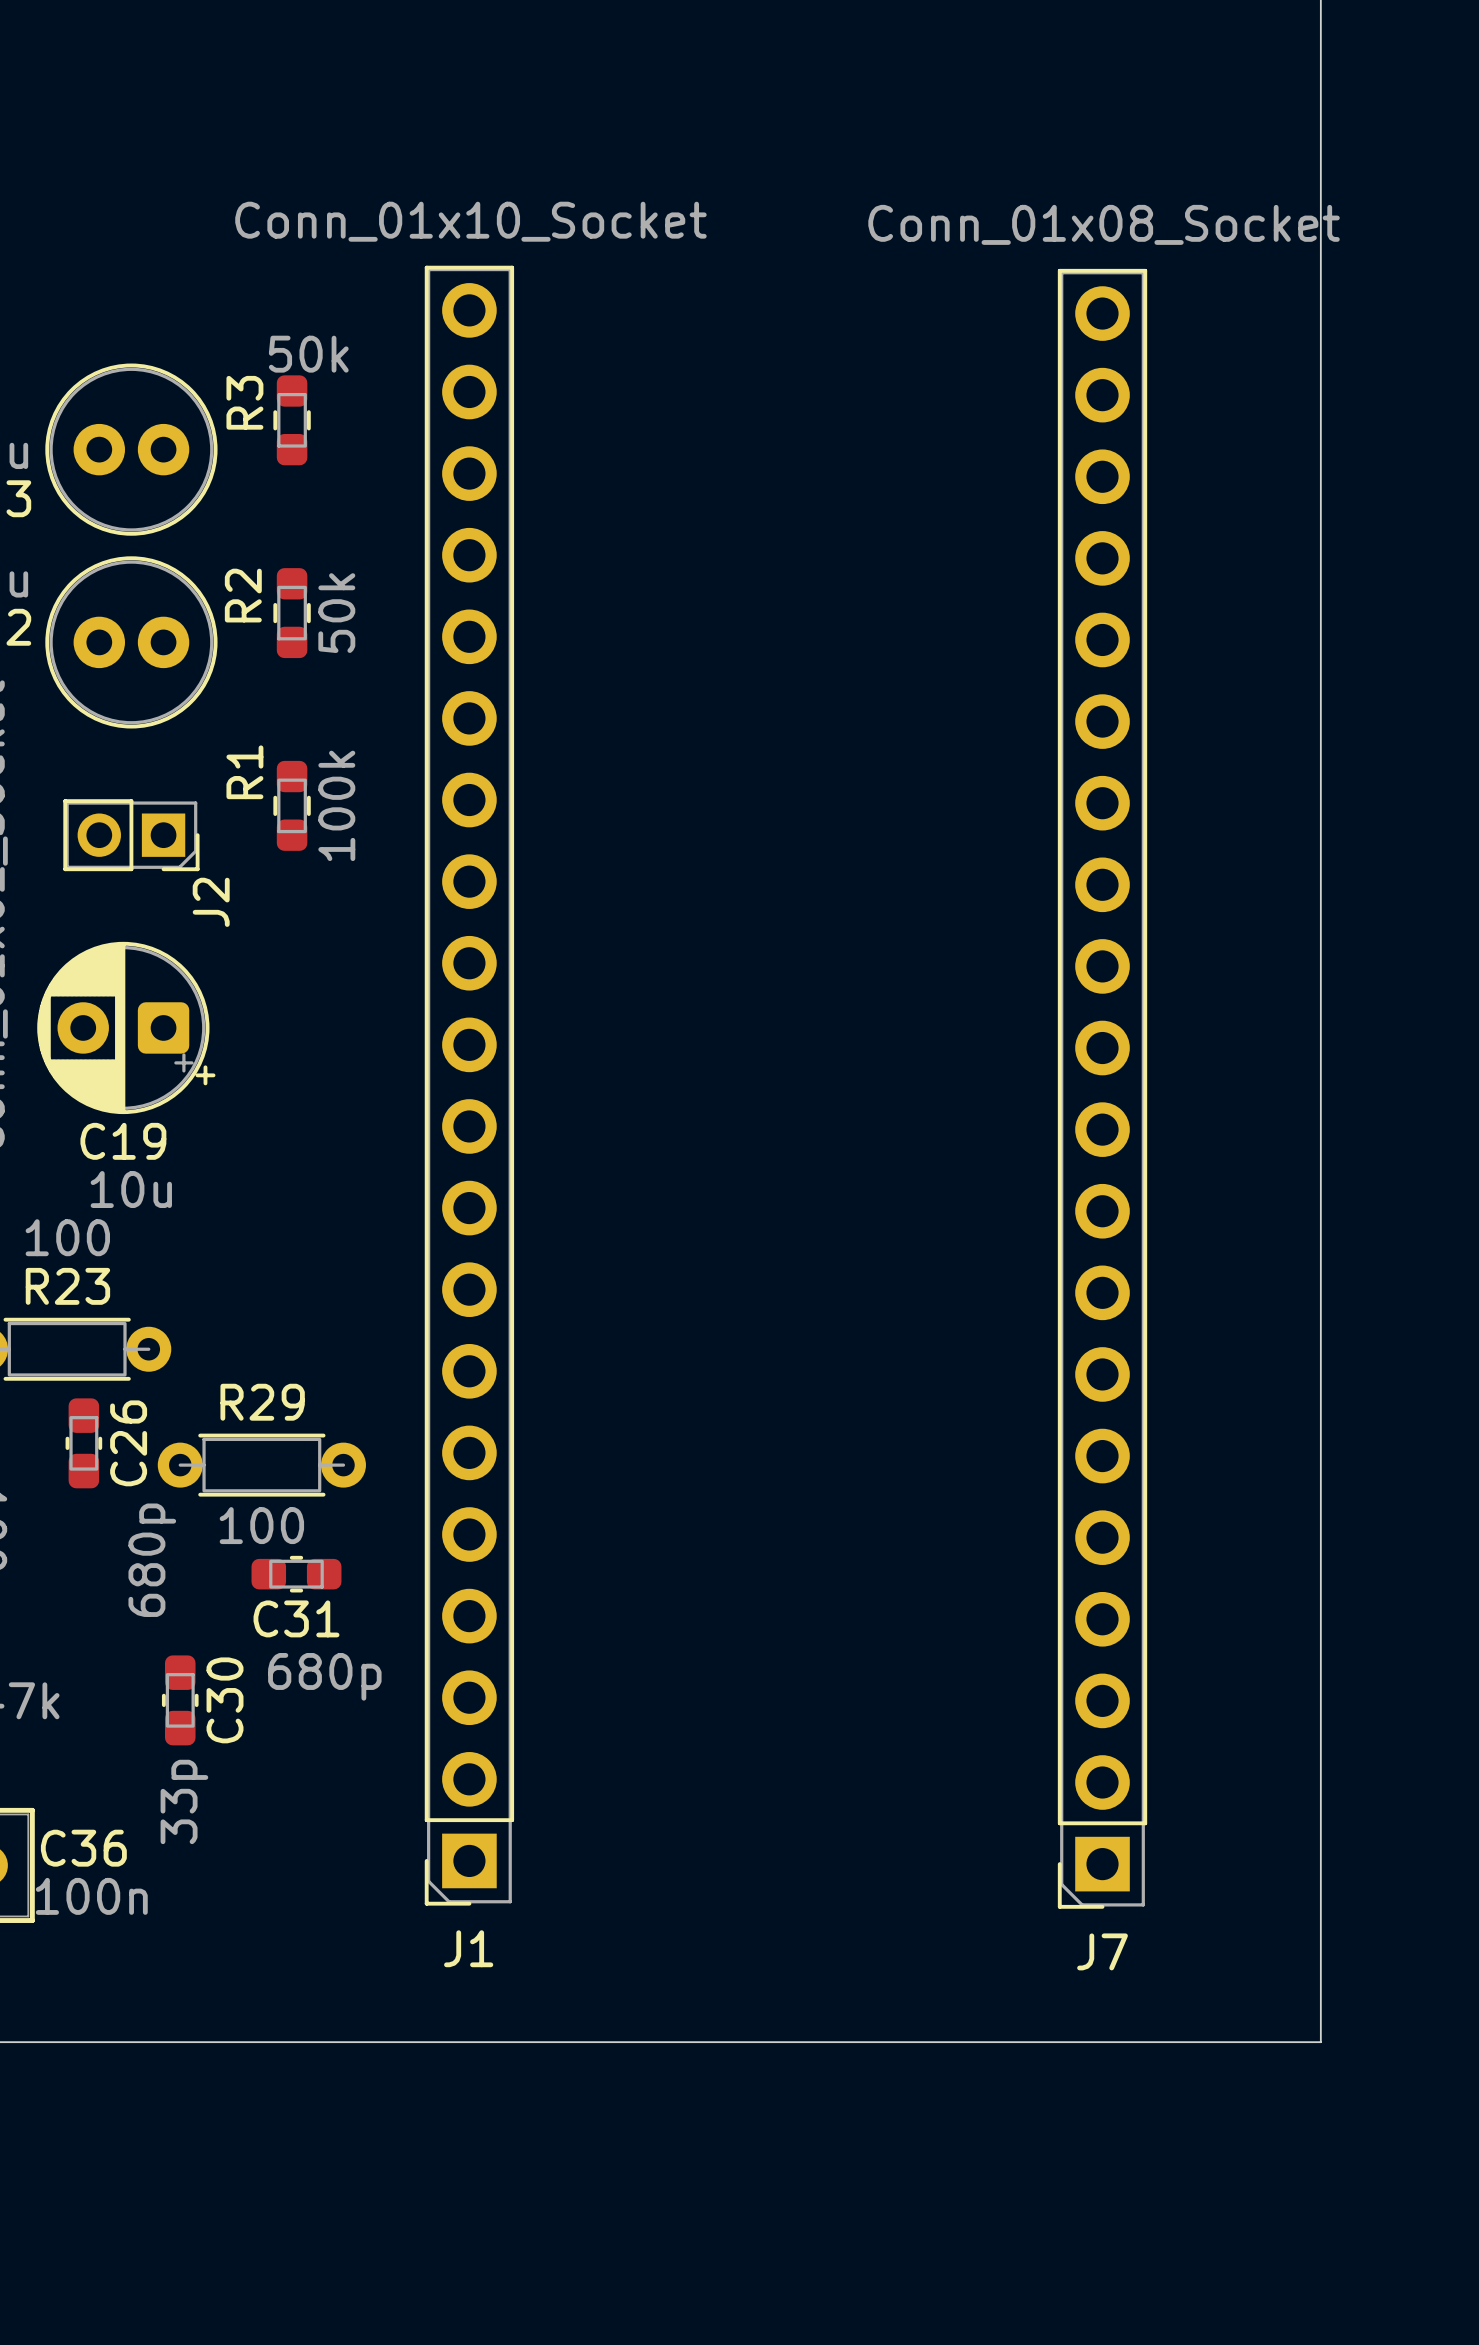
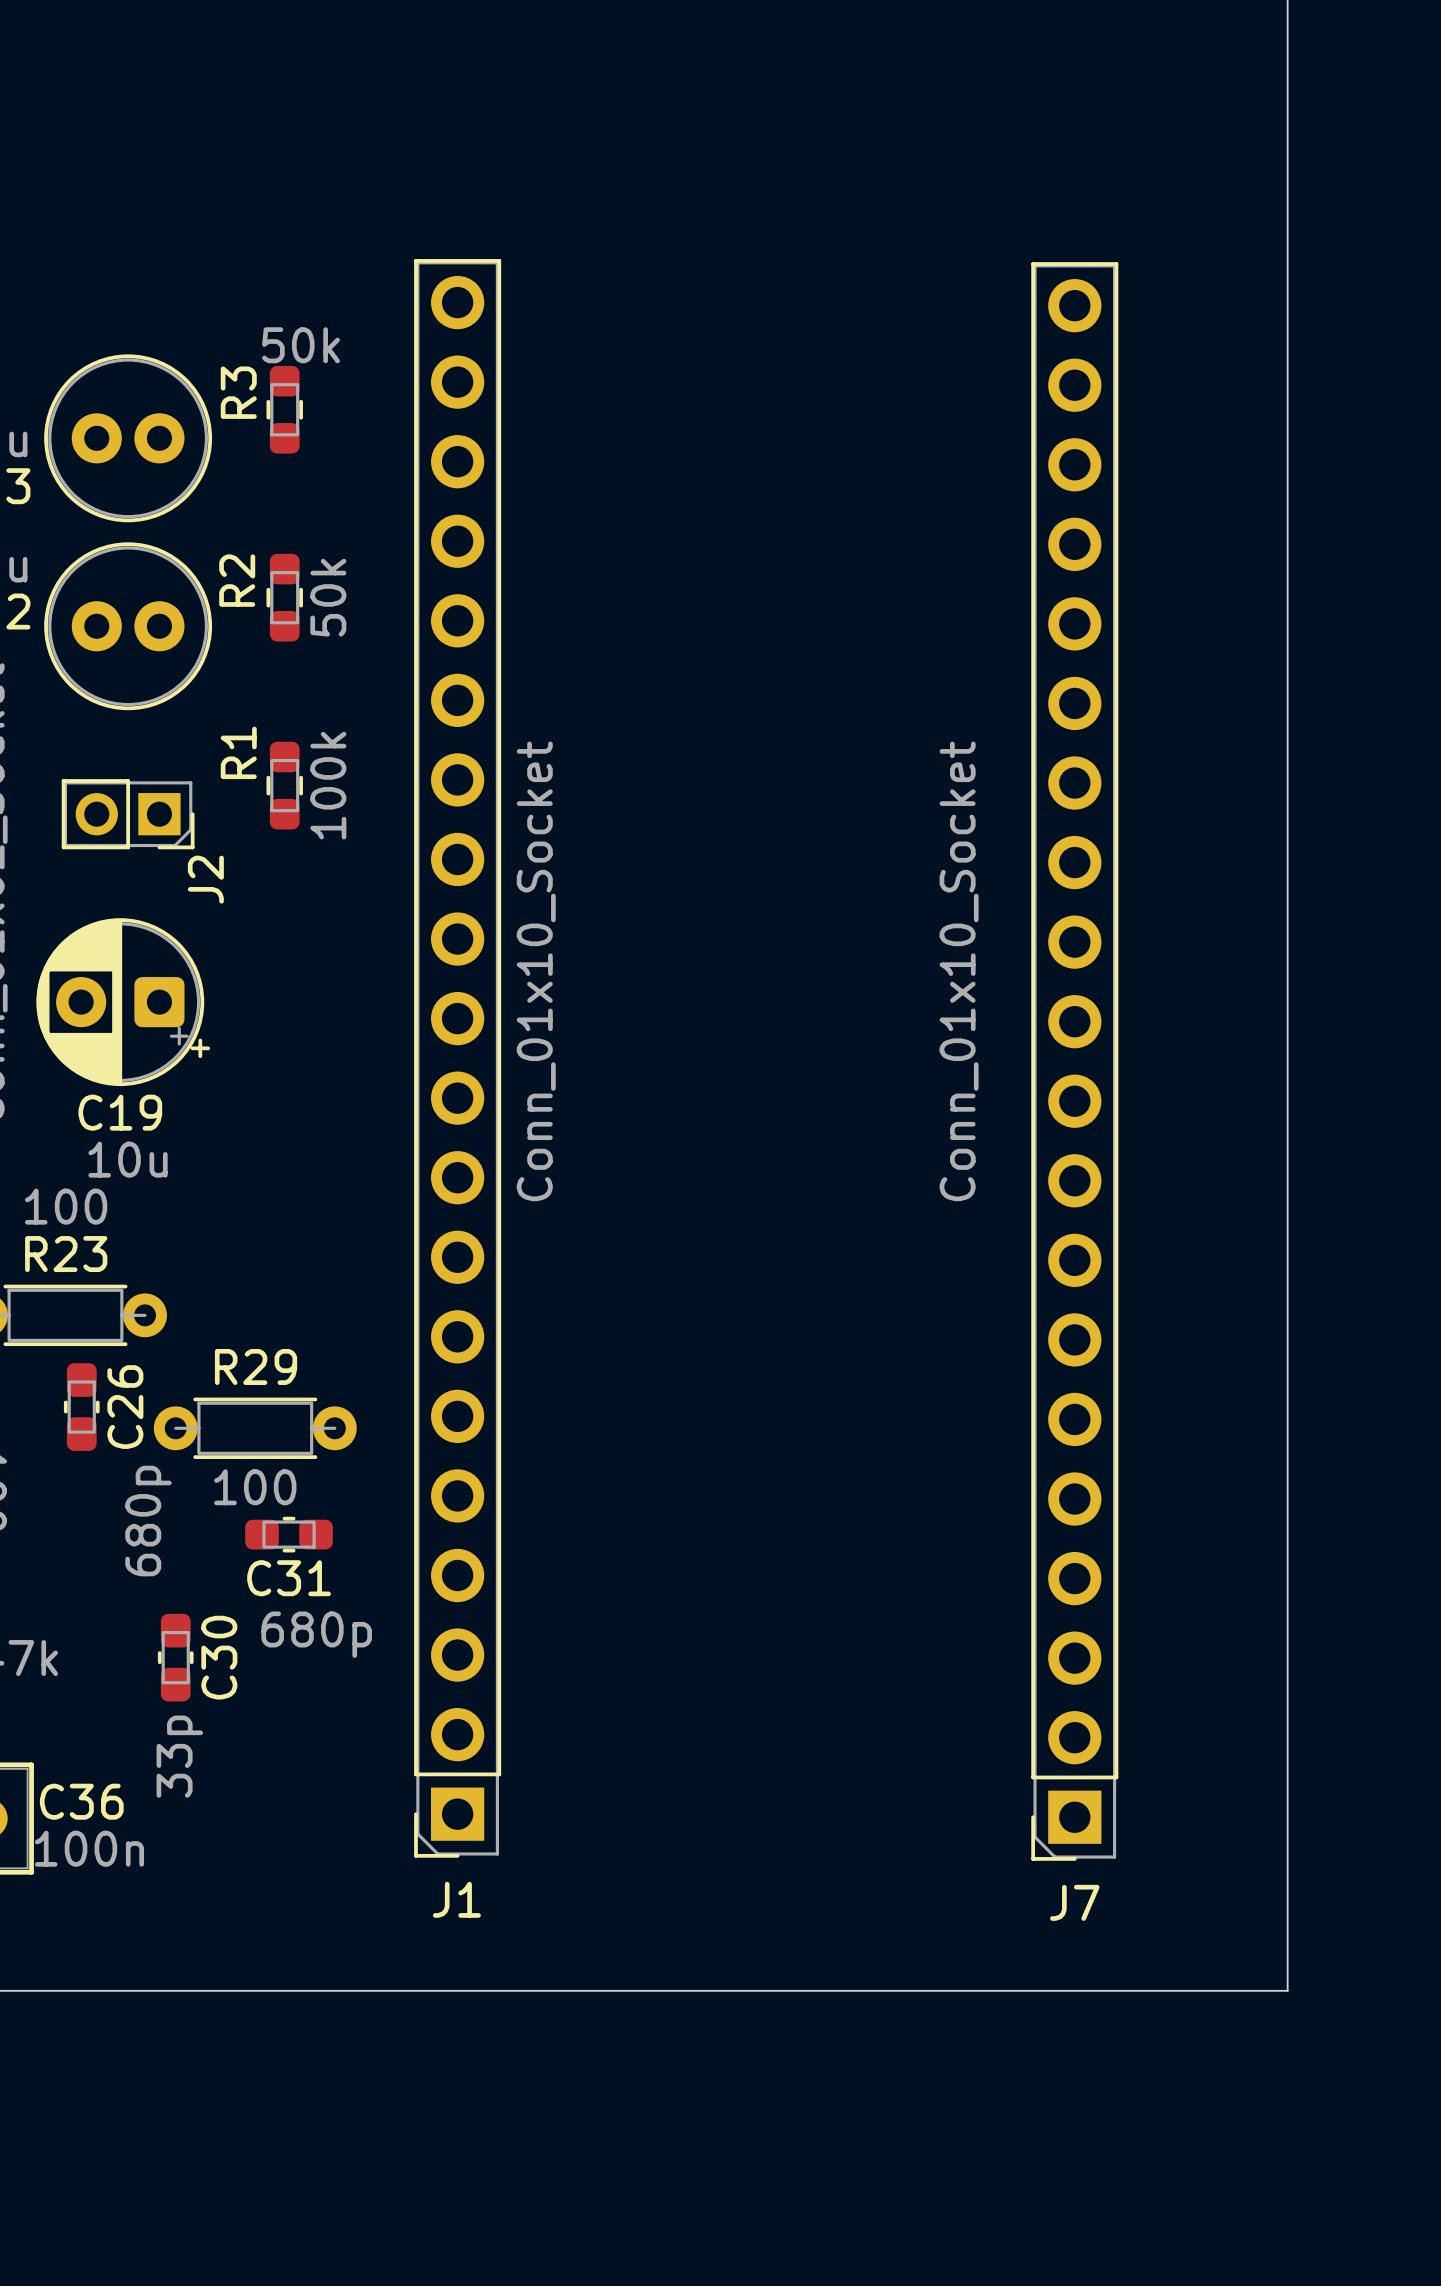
J1 value rotation: 0° (470, 221) -> 90° counterclockwise (536, 971)
J1 value position: Conn_01x10_Socket (470, 221) -> Conn_01x10_Socket (536, 971)
J7 value: Conn_01x08_Socket (1104, 224) -> none
text: none -> Conn_01x10_Socket (959, 971)

